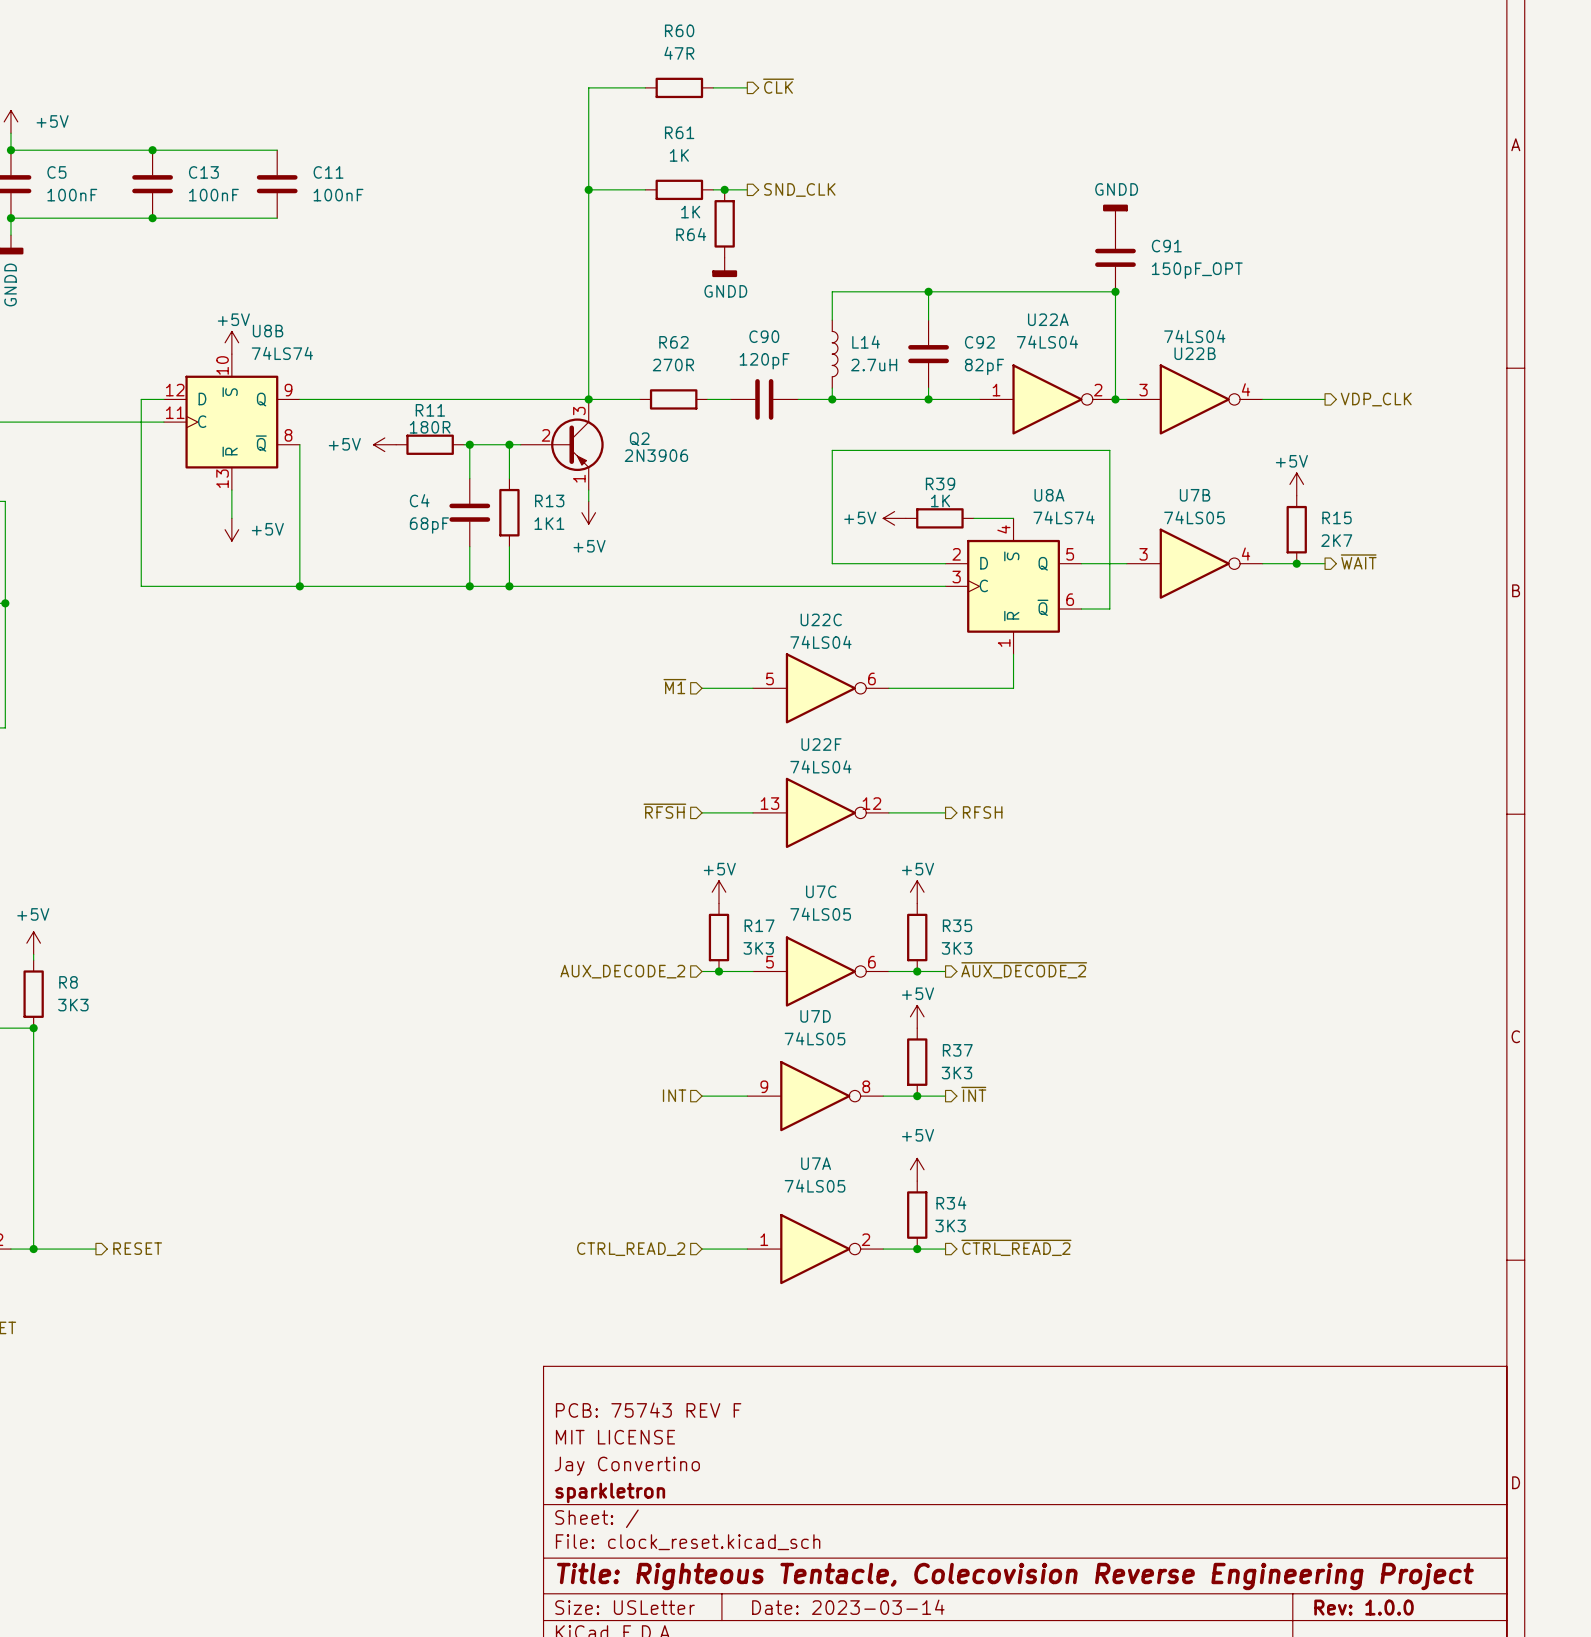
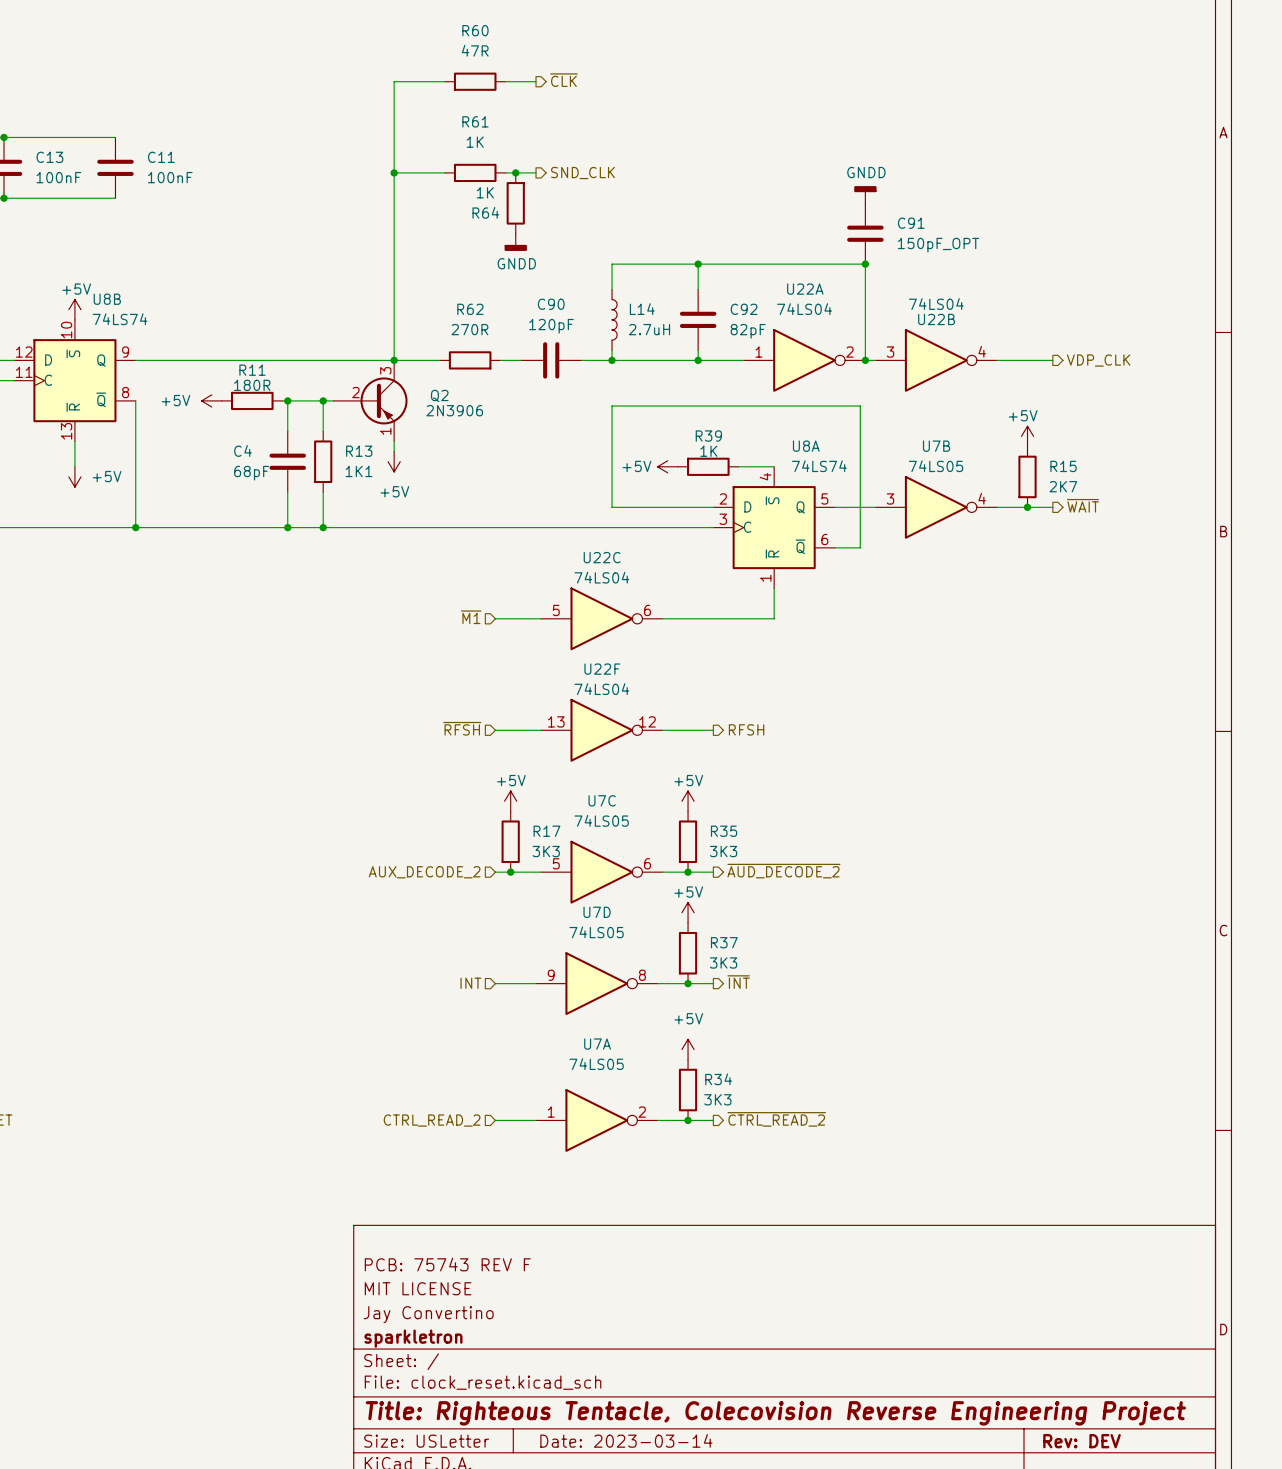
hierarchical label: ~{AUX_DECODE_2} (1024, 970) -> ~{AUD_DECODE_2} (783, 871)
title block: Rev: 1.0.0 (1364, 1607) -> Rev: DEV (1082, 1441)

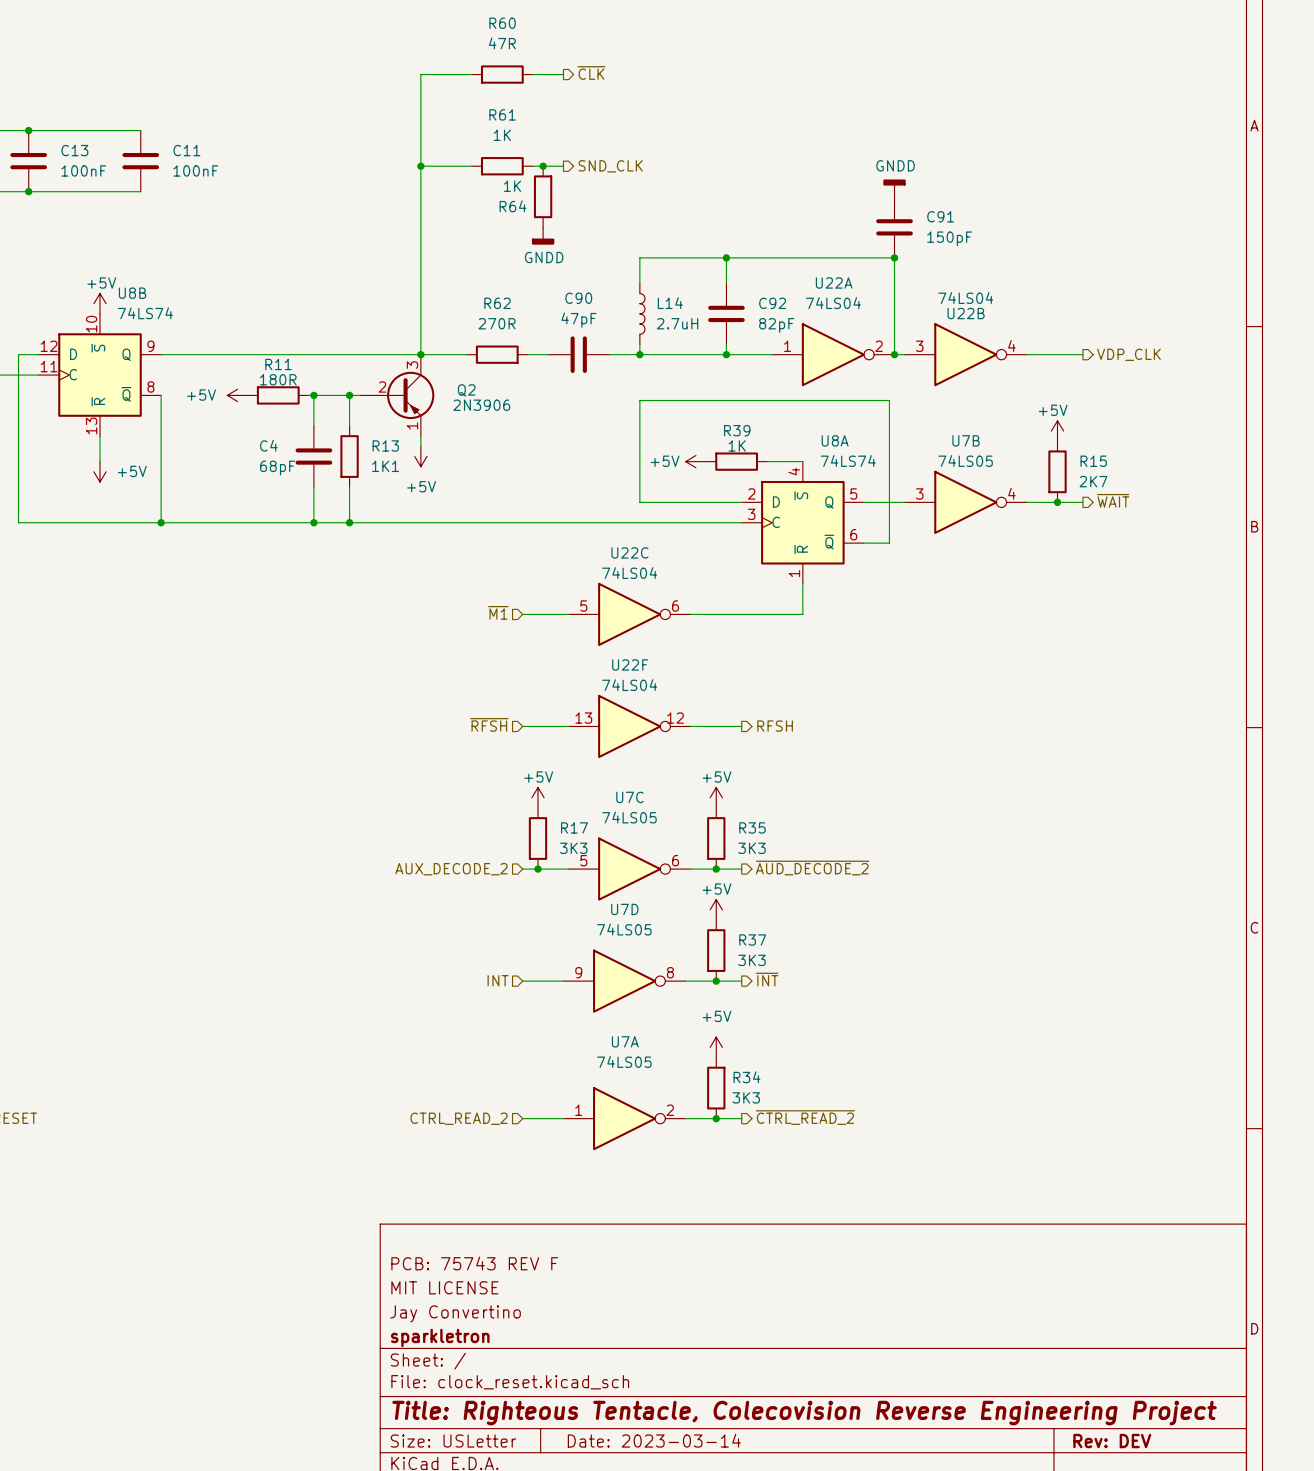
C91 value: 150pF_OPT (938, 245) -> 150pF (949, 238)
C90 value: 120pF (551, 326) -> 47pF (579, 320)

